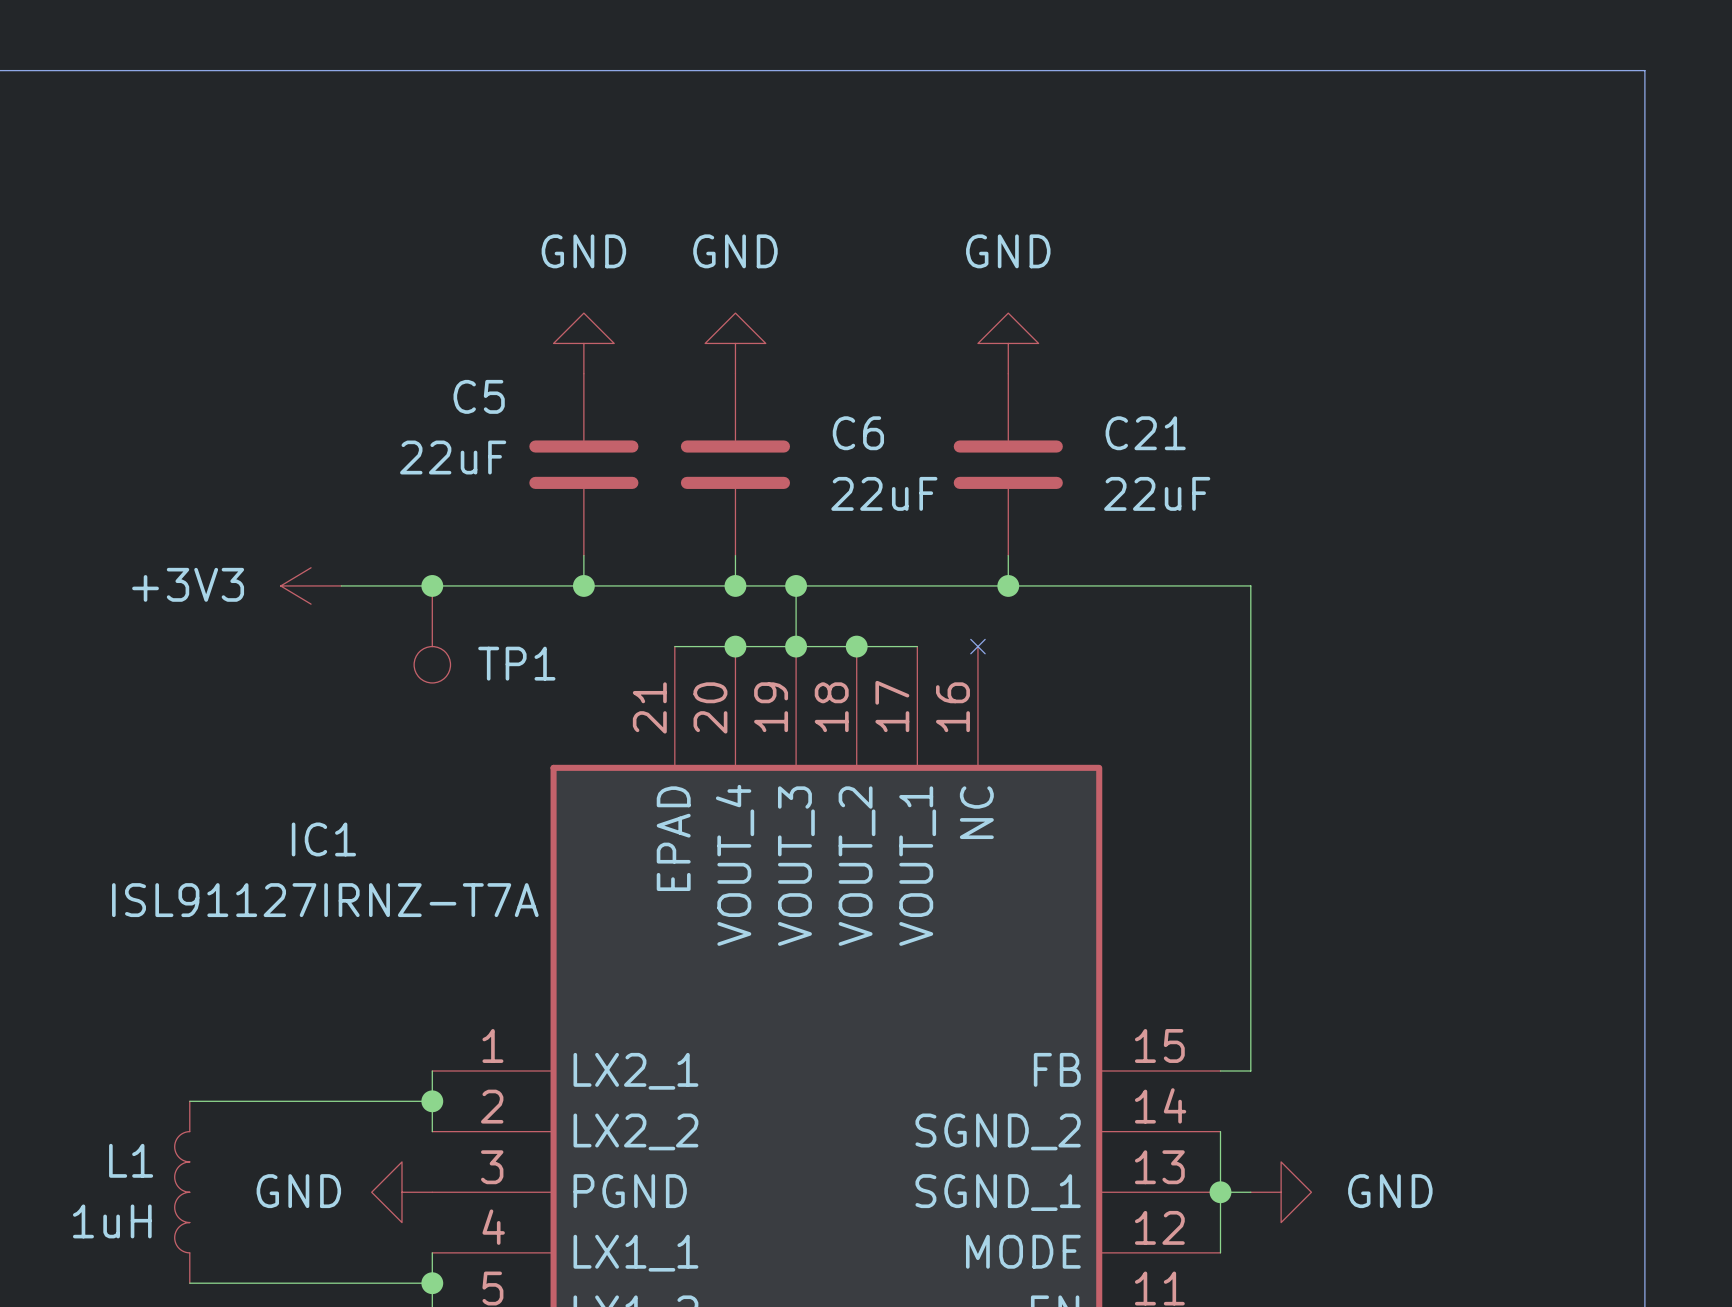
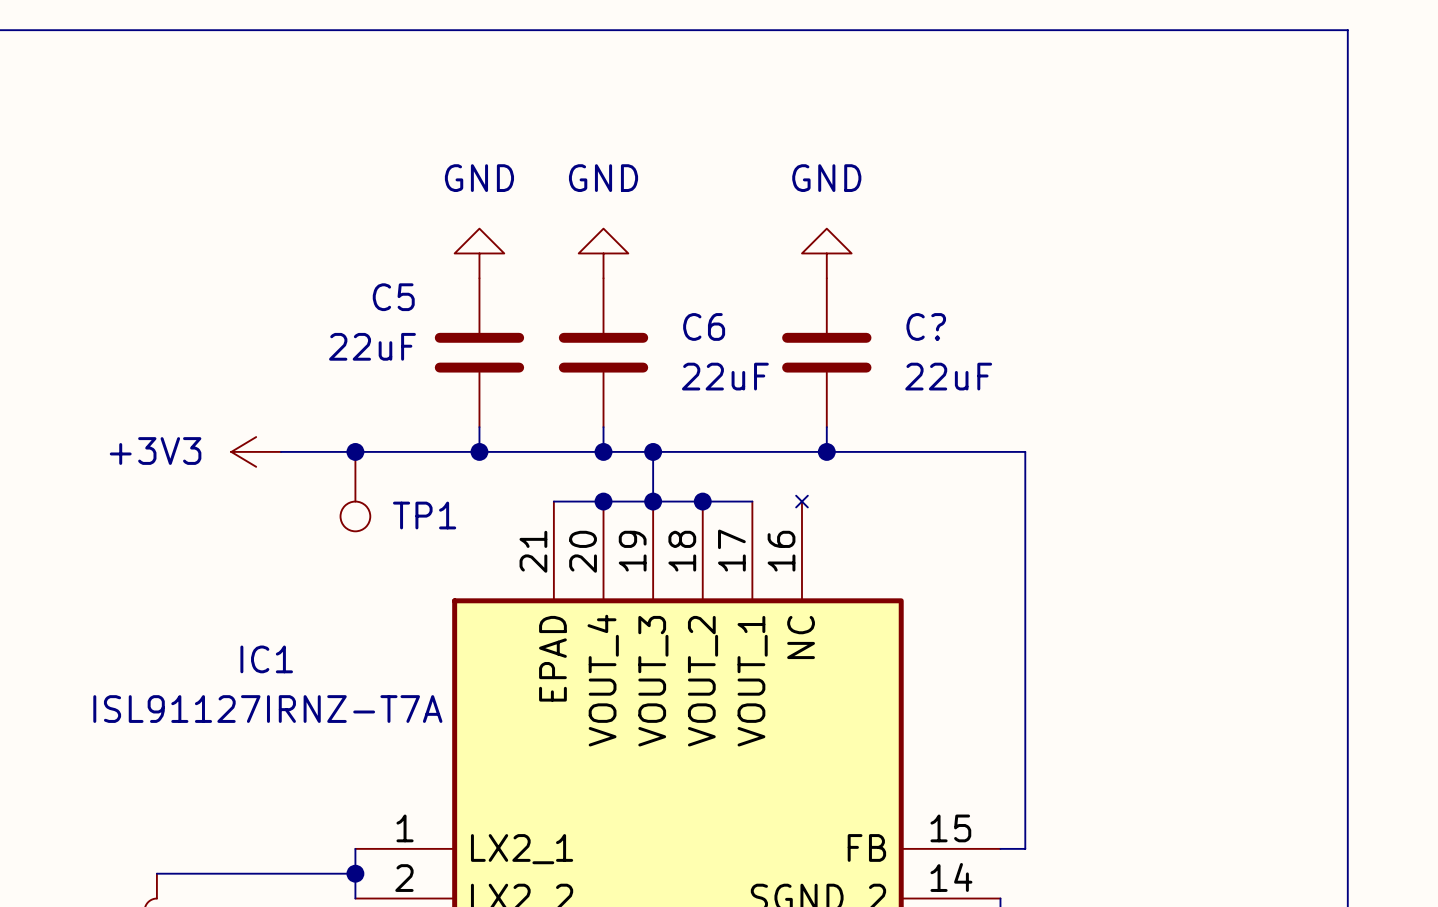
C21 name: C21 (1145, 433) -> C? (926, 326)

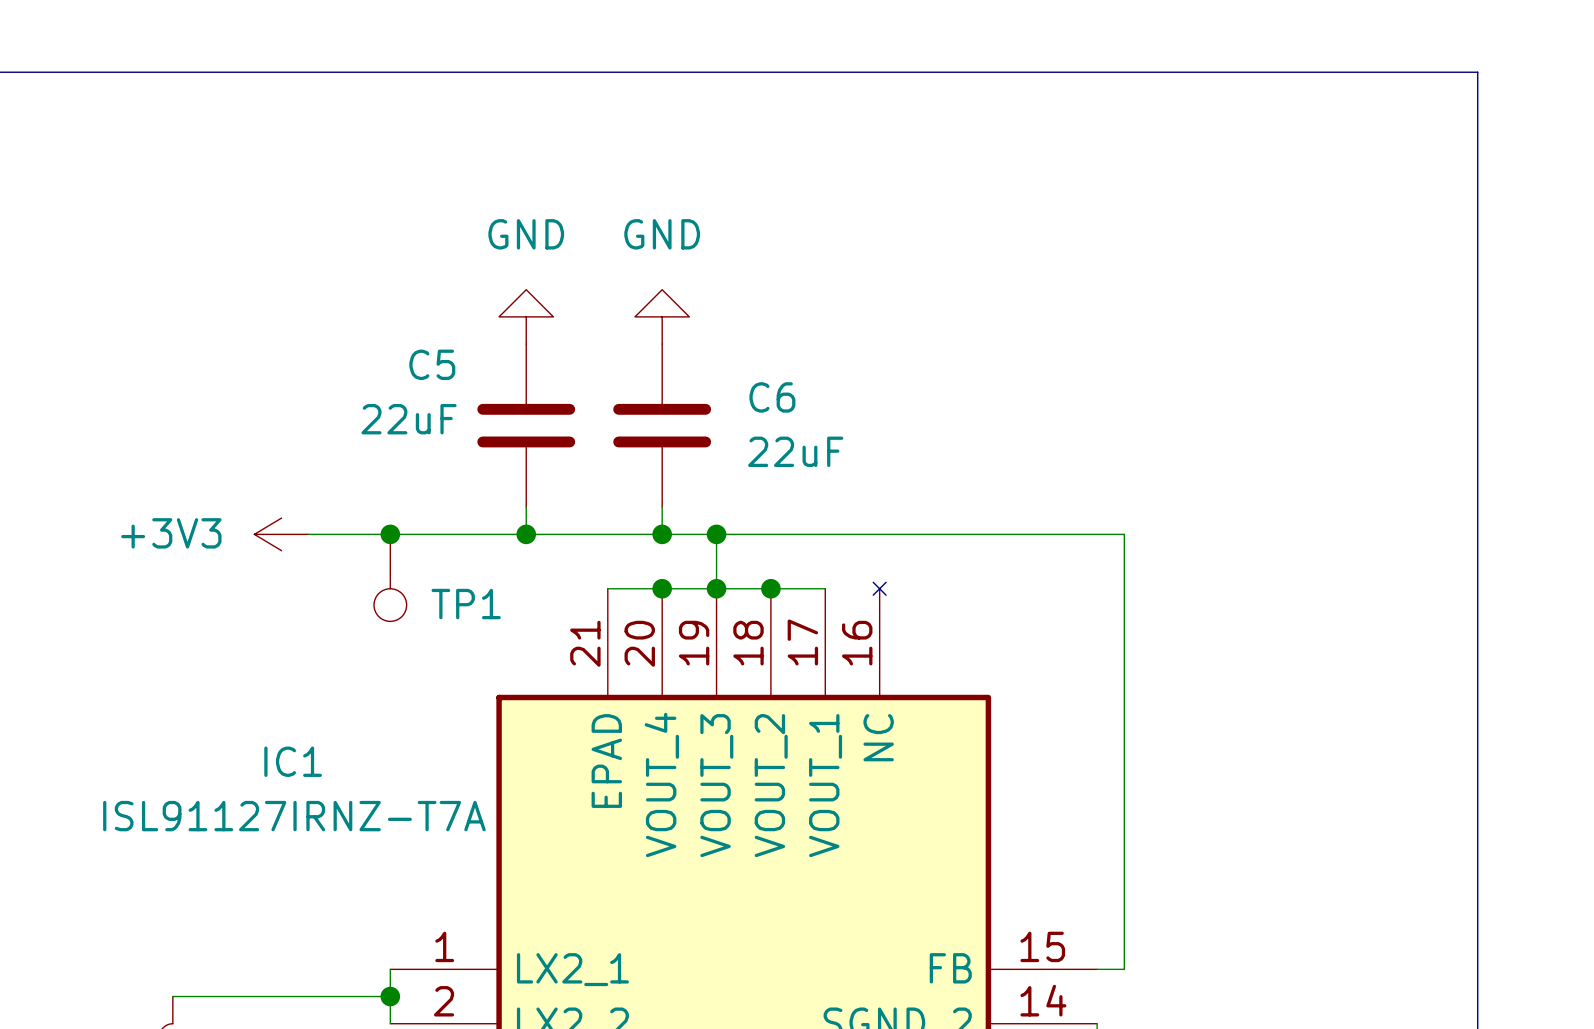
power symbol: GND (826, 253) -> none
C?: 22uF (826, 352) -> none
wire: (826, 427) (826, 451) -> none
junction: (826, 451) -> none

